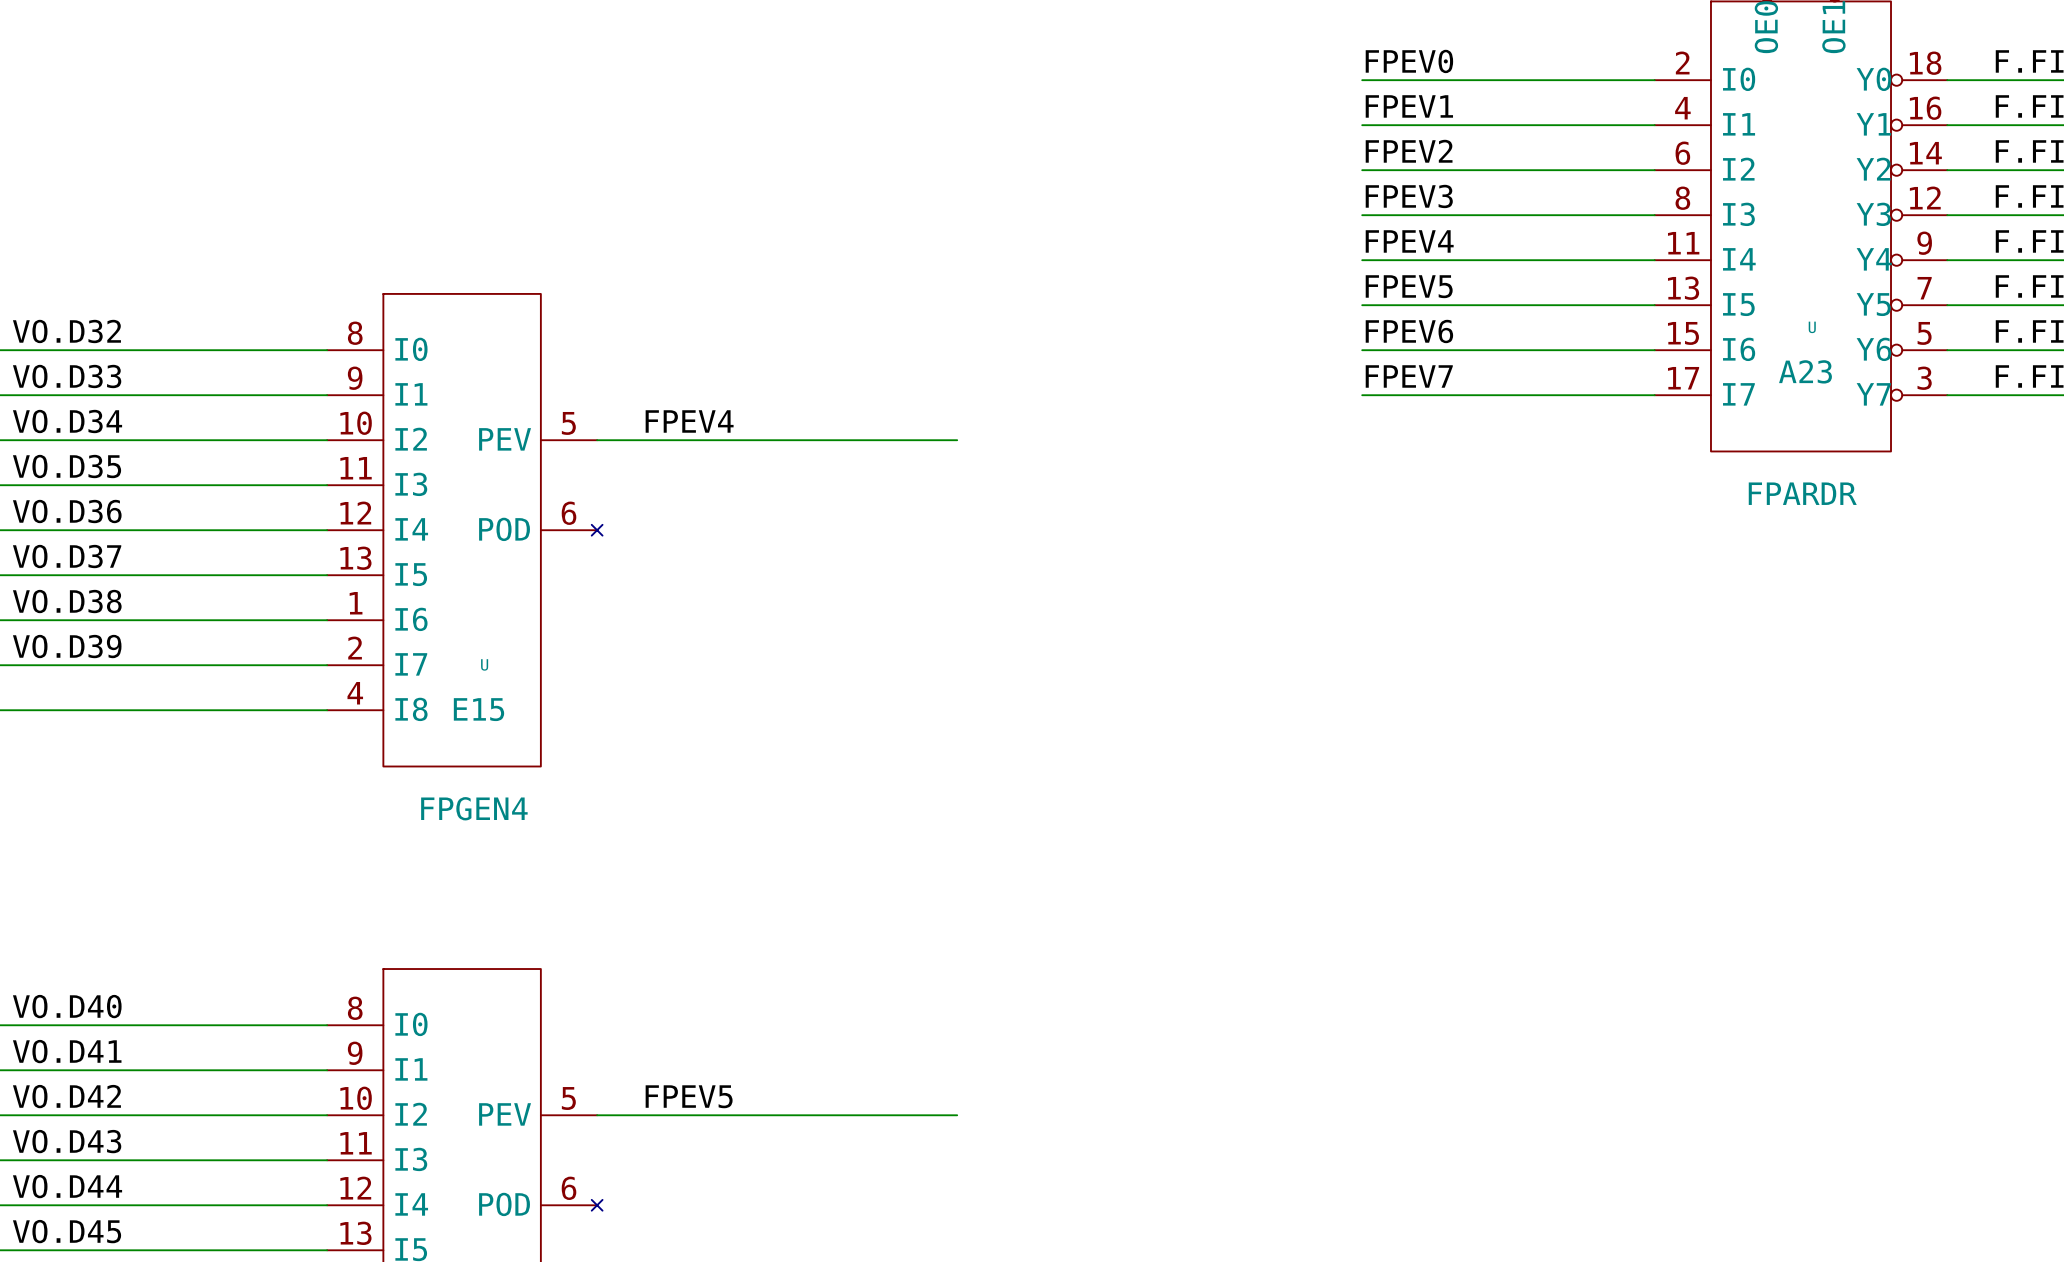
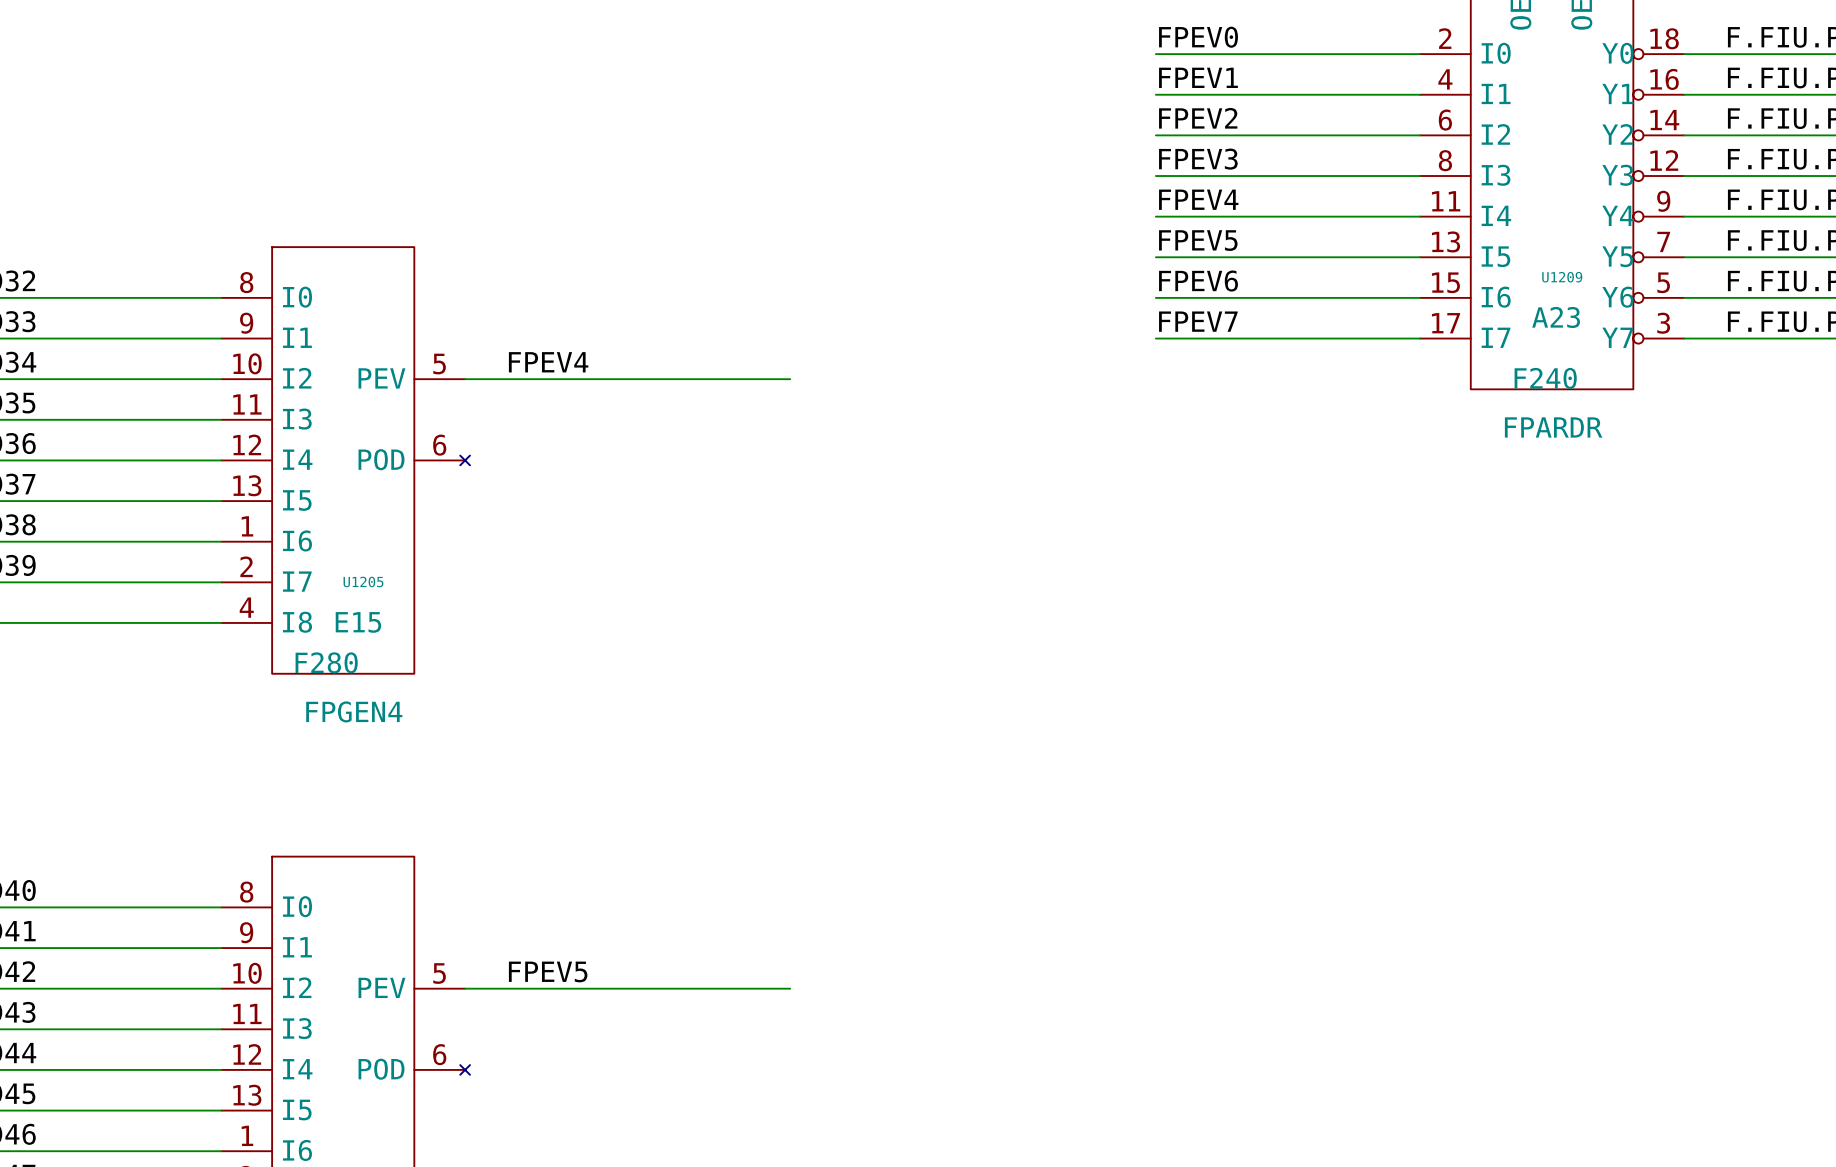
U name: U (1812, 327) -> U1209 (1562, 277)
U value: none -> F240 (1545, 378)
U name: U (484, 664) -> U1205 (363, 581)
U value: none -> F280 (326, 662)

